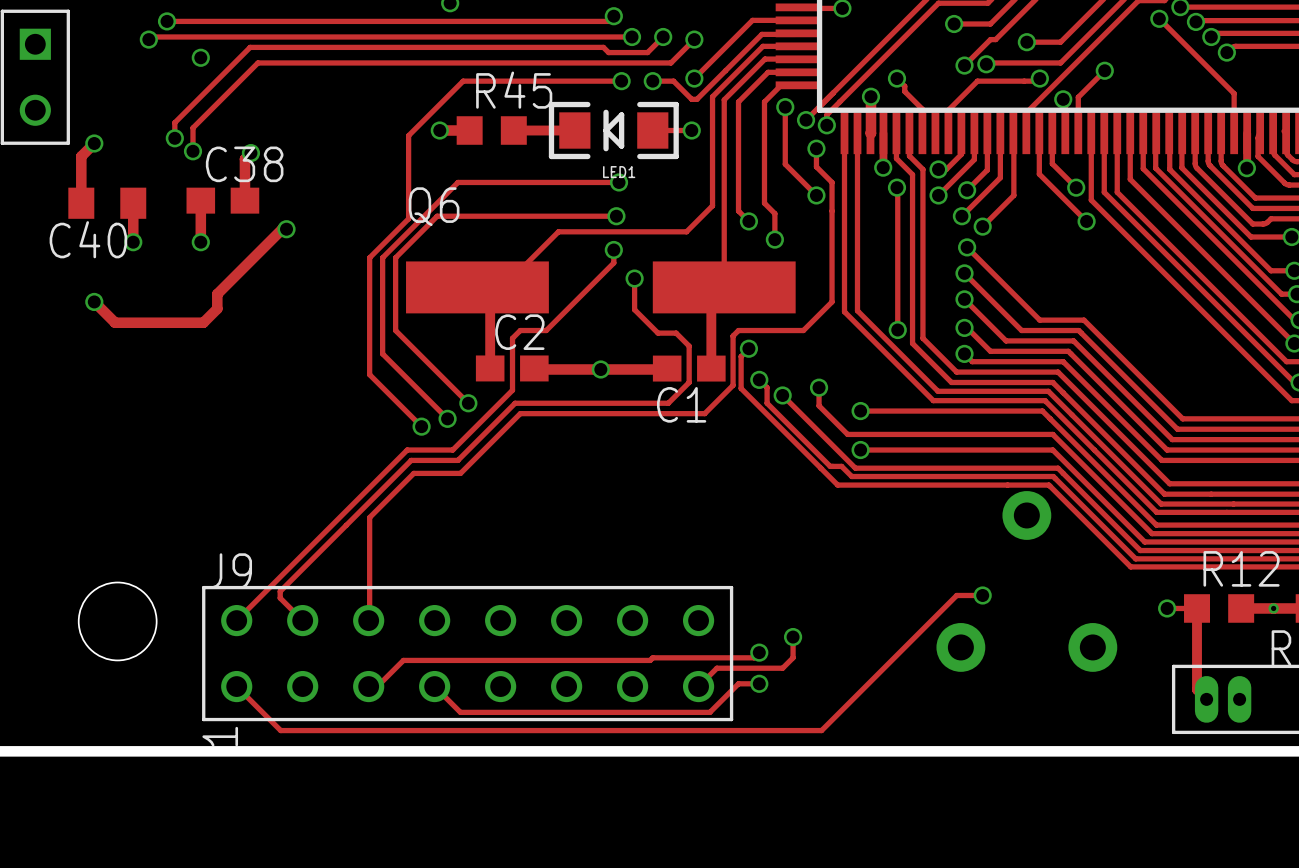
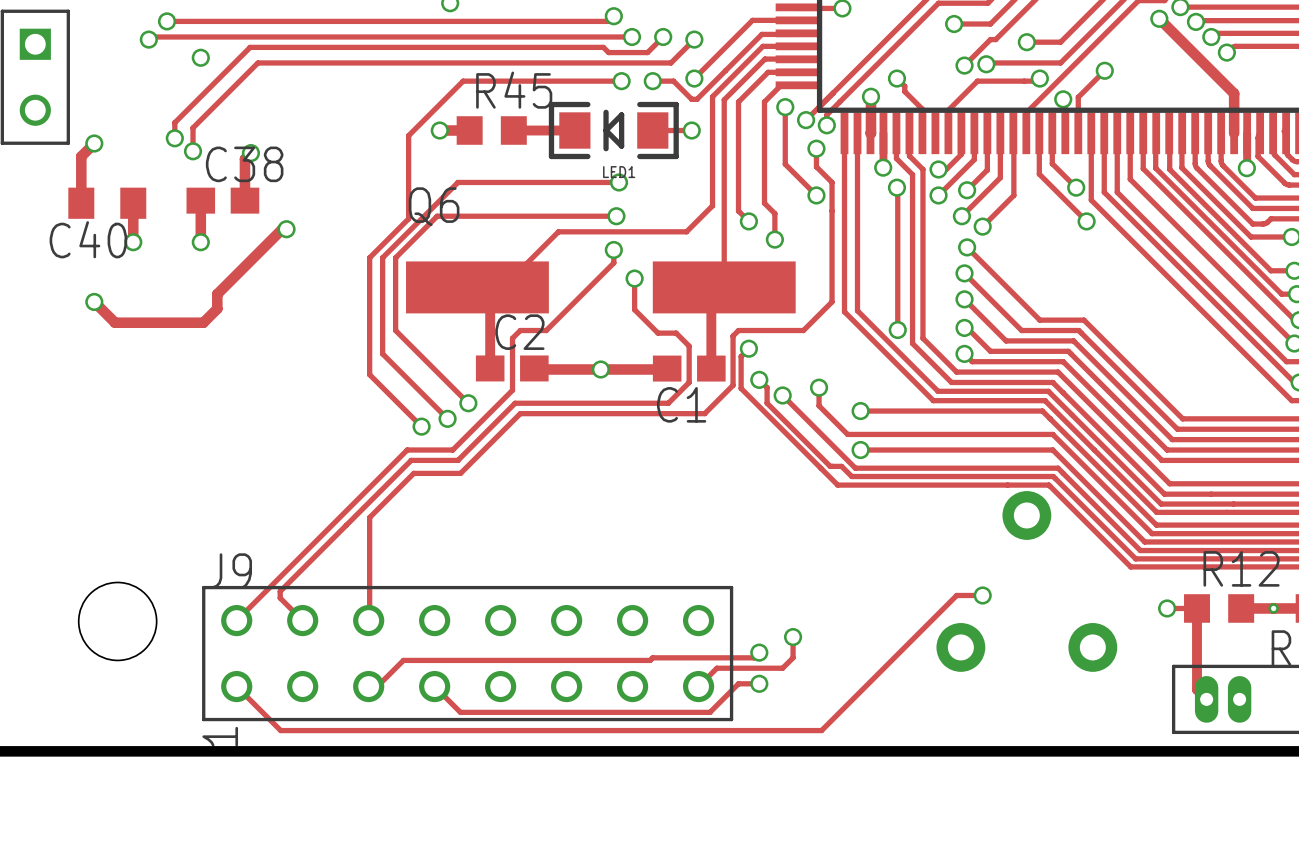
track width: thin (1159, 18) (1234, 93) (1234, 133) -> thick (1159, 18) (1234, 93) (1234, 133)

